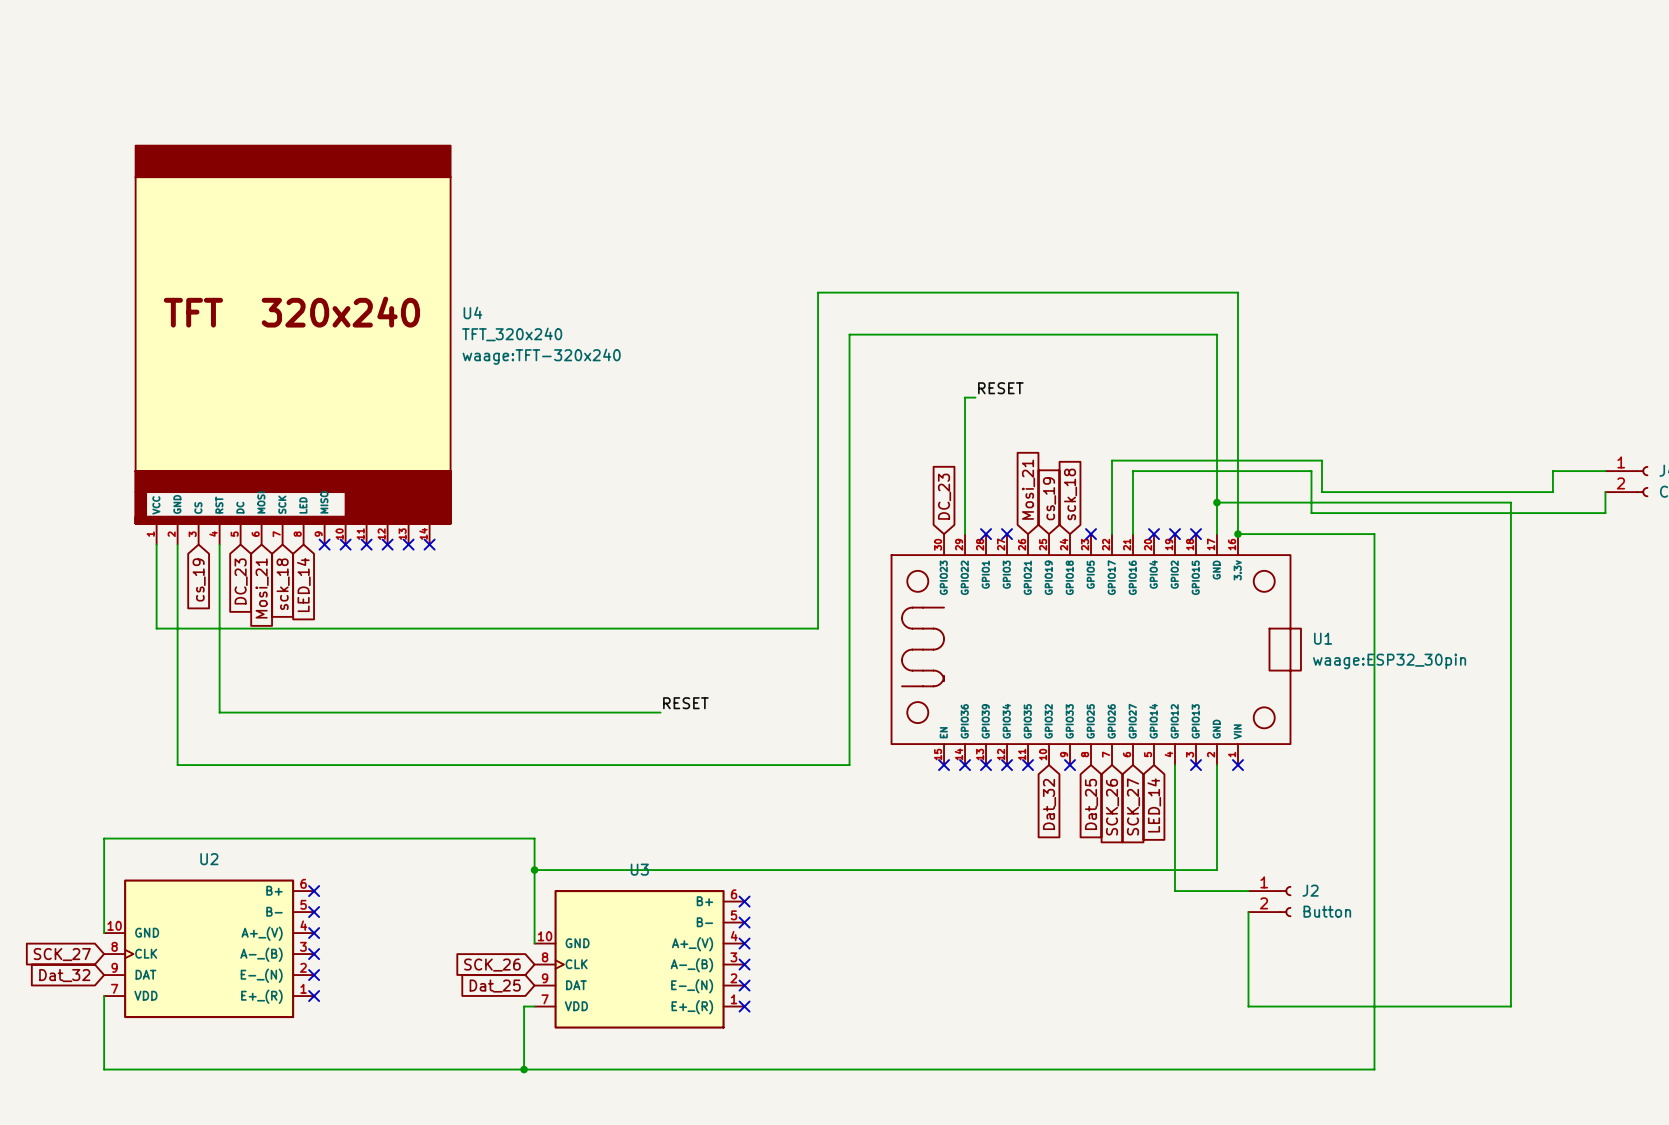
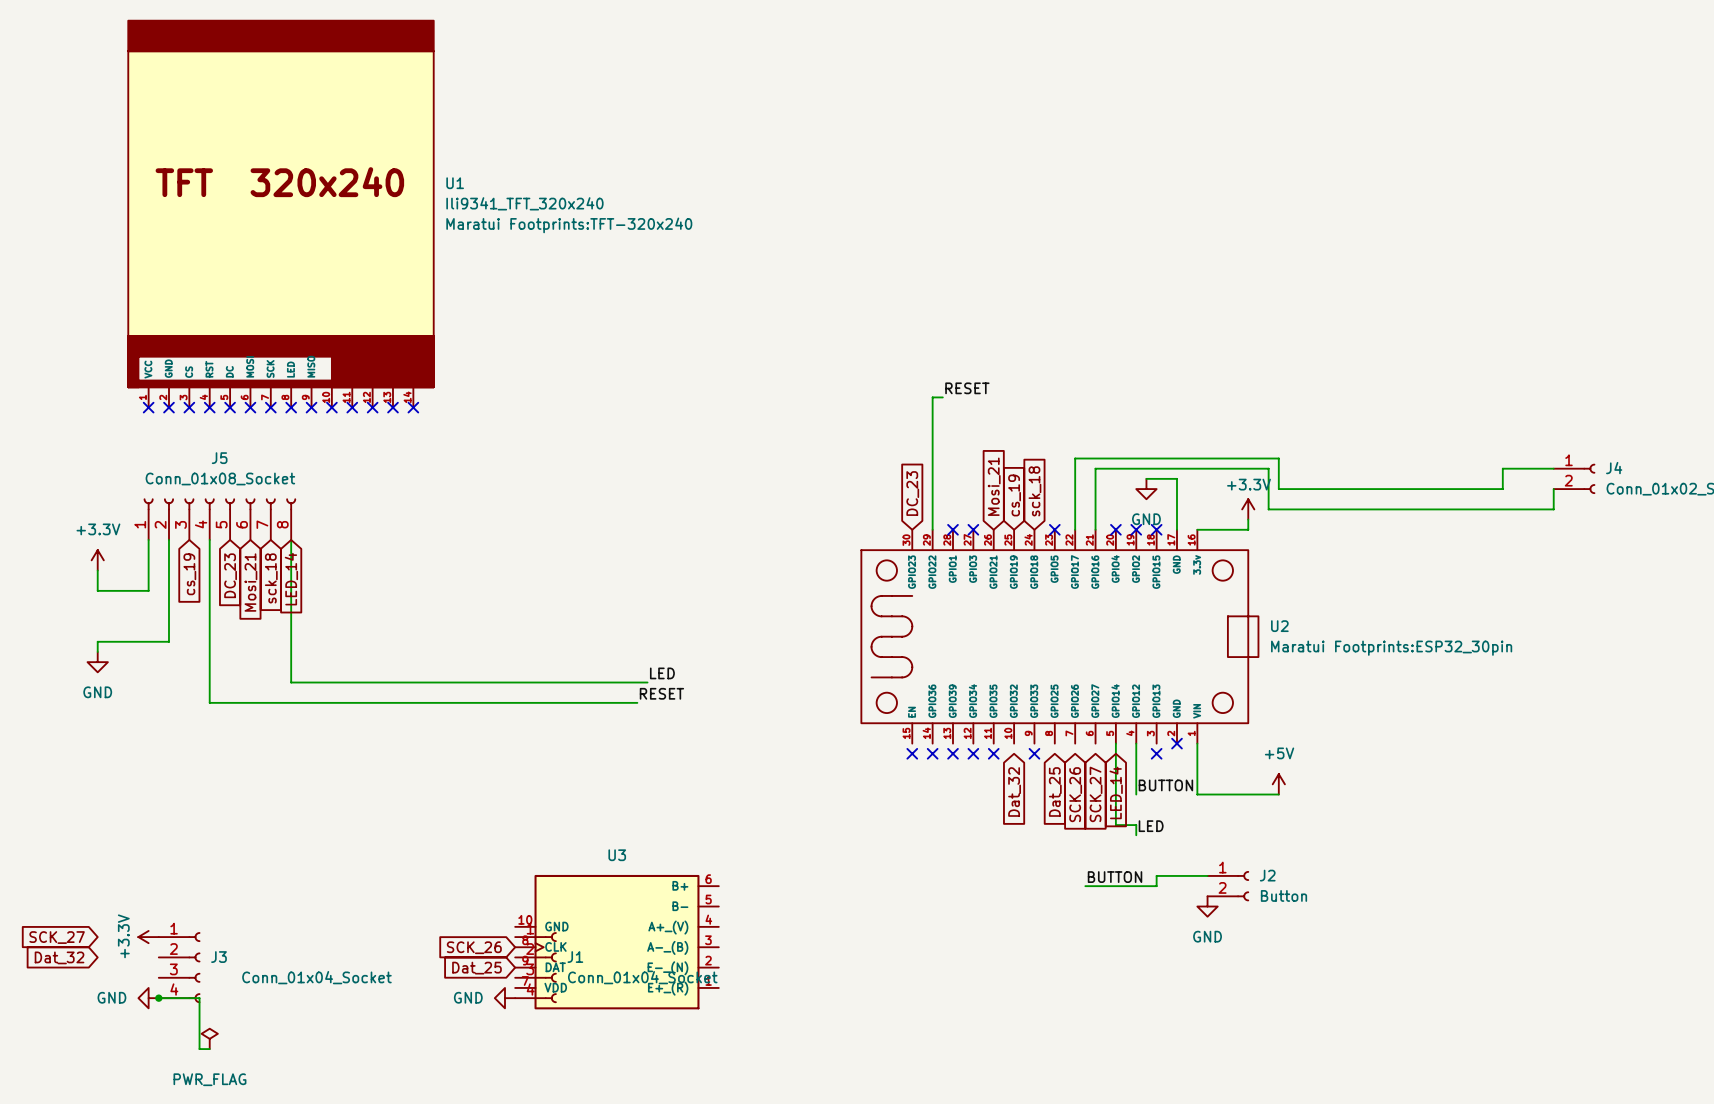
U1 value: none -> Ili9341_TFT_320x240 (524, 203)
U4: TFT_320x240 (293, 345) -> none
no-connect mark: none -> (148, 407)
no-connect mark: none -> (168, 407)
no-connect mark: none -> (189, 407)
no-connect mark: none -> (209, 407)
no-connect mark: none -> (230, 407)
no-connect mark: none -> (250, 407)
no-connect mark: none -> (270, 407)
no-connect mark: none -> (291, 407)
no-connect mark: none -> (311, 407)
no-connect mark: none -> (331, 407)
no-connect mark: none -> (352, 407)
no-connect mark: none -> (372, 407)
no-connect mark: none -> (392, 407)
no-connect mark: none -> (413, 407)
wire: (1216, 481) (1216, 334) (849, 334) (849, 765) (177, 765) (177, 649) -> (1176, 478) (1146, 478)
power symbol: none -> GND (1146, 489)
wire: (1216, 502) (1510, 502) (1510, 1006) (1248, 1006) (1248, 912) -> none
junction: (1216, 502) -> none
power symbol: none -> +3.3V (1248, 509)
J5: none -> Conn_01x08_Socket (219, 519)
U1 symbol: [891, 534, 1301, 766] -> [128, 20, 434, 408]
wire: (1237, 534) (1237, 292) (818, 292) (818, 628) (156, 628) (156, 597) -> (97, 570) (97, 590) (148, 590)
junction: (1237, 534) -> none
wire: (1290, 534) (1374, 534) (1374, 1069) (219, 1069) -> (1248, 529) (1248, 519)
wire: none -> (291, 539) (291, 682) (647, 682)
no-connect mark: (324, 544) -> none
no-connect mark: (345, 544) -> none
no-connect mark: (366, 544) -> none
no-connect mark: (387, 544) -> none
no-connect mark: (408, 544) -> none
no-connect mark: (429, 544) -> none
power symbol: none -> +3.3V (97, 560)
U1 name position: U1 (1323, 638) -> U1 (455, 183)
wire: none -> (168, 641) (97, 641) (97, 651)
U2 text: none -> Maratui Footprints:ESP32_30pin (1391, 648)
U1 text: waage:ESP32_30pin (1389, 661) -> Maratui Footprints:TFT-320x240 (569, 225)
power symbol: none -> GND (97, 662)
label: none -> LED (662, 673)
wire: none -> (1197, 743) (1197, 794) (1278, 794)
wire: (1216, 765) (1216, 870) (534, 870) -> none
no-connect mark position: (1237, 765) -> (1176, 743)
power symbol: none -> +5V (1278, 784)
label: none -> BUTTON (1165, 785)
wire: (1174, 807) (1174, 838) -> (1115, 743) (1115, 825) (1136, 825)
label: none -> LED (1151, 826)
wire: (1174, 849) (1174, 891) (1195, 891) -> (1085, 886) (1156, 886) (1156, 875)
U2 name position: U2 (209, 859) -> U2 (1279, 626)
junction: (534, 870) -> none
U2 symbol: [104, 879, 315, 1019] -> [861, 529, 1259, 744]
no-connect mark: (314, 891) -> none
label: none -> BUTTON (1115, 877)
no-connect mark: (744, 901) -> none
no-connect mark: (314, 912) -> none
no-connect mark: (744, 922) -> none
power symbol: none -> GND (1207, 906)
wire: (104, 933) (104, 838) (534, 838) (534, 943) -> none
no-connect mark: (314, 933) -> none
no-connect mark: (744, 943) -> none
power symbol: none -> +3.3V (148, 937)
no-connect mark: (314, 954) -> none
no-connect mark: (744, 964) -> none
no-connect mark: (314, 975) -> none
J3: none -> Conn_01x04_Socket (179, 967)
J1: none -> Conn_01x04_Socket (535, 967)
no-connect mark: (744, 985) -> none
wire: (104, 996) (104, 1069) (209, 1069) -> (158, 998) (199, 998) (199, 1049)
no-connect mark: (314, 996) -> none
wire: (534, 1006) (524, 1006) (524, 1069) -> none
no-connect mark: (744, 1006) -> none
power symbol: none -> GND (148, 998)
junction: none -> (158, 998)
power symbol: none -> GND (504, 998)
power symbol: none -> PWR_FLAG (209, 1038)
junction: (524, 1069) -> none

